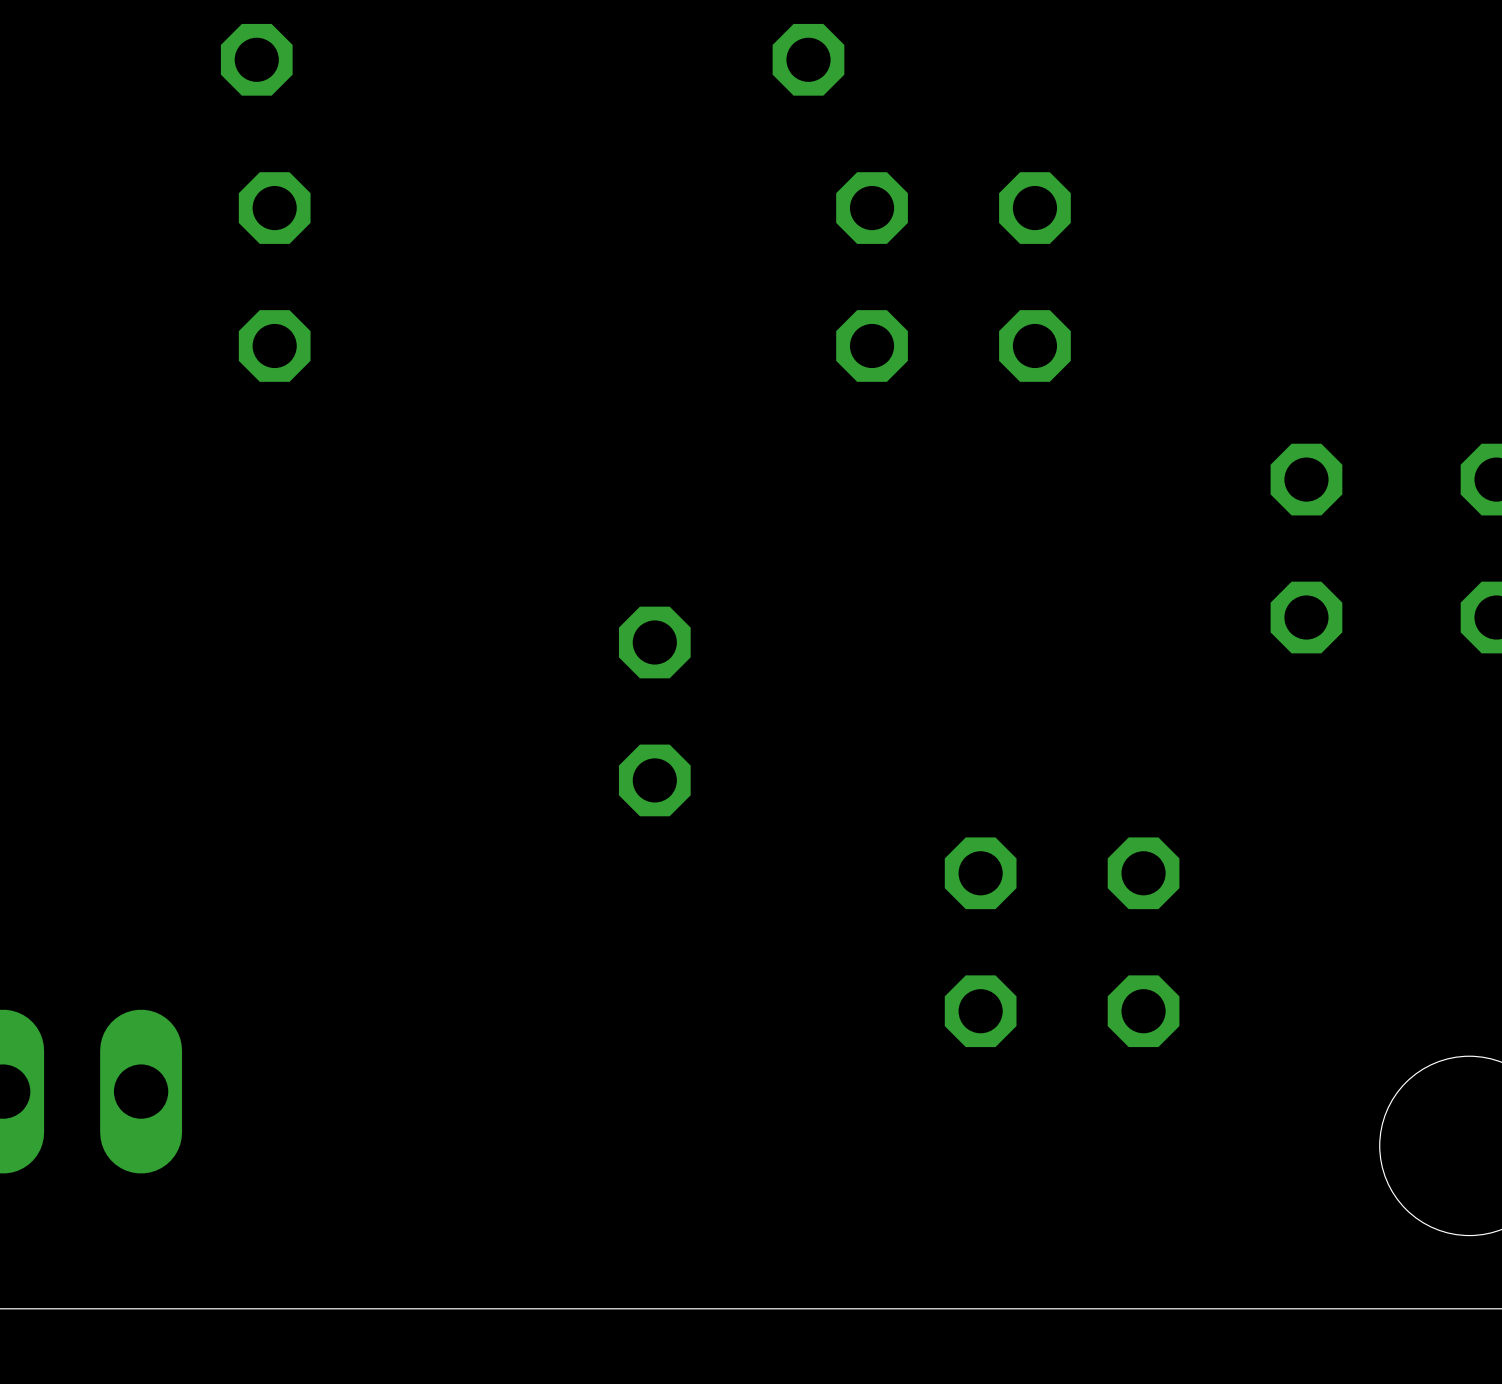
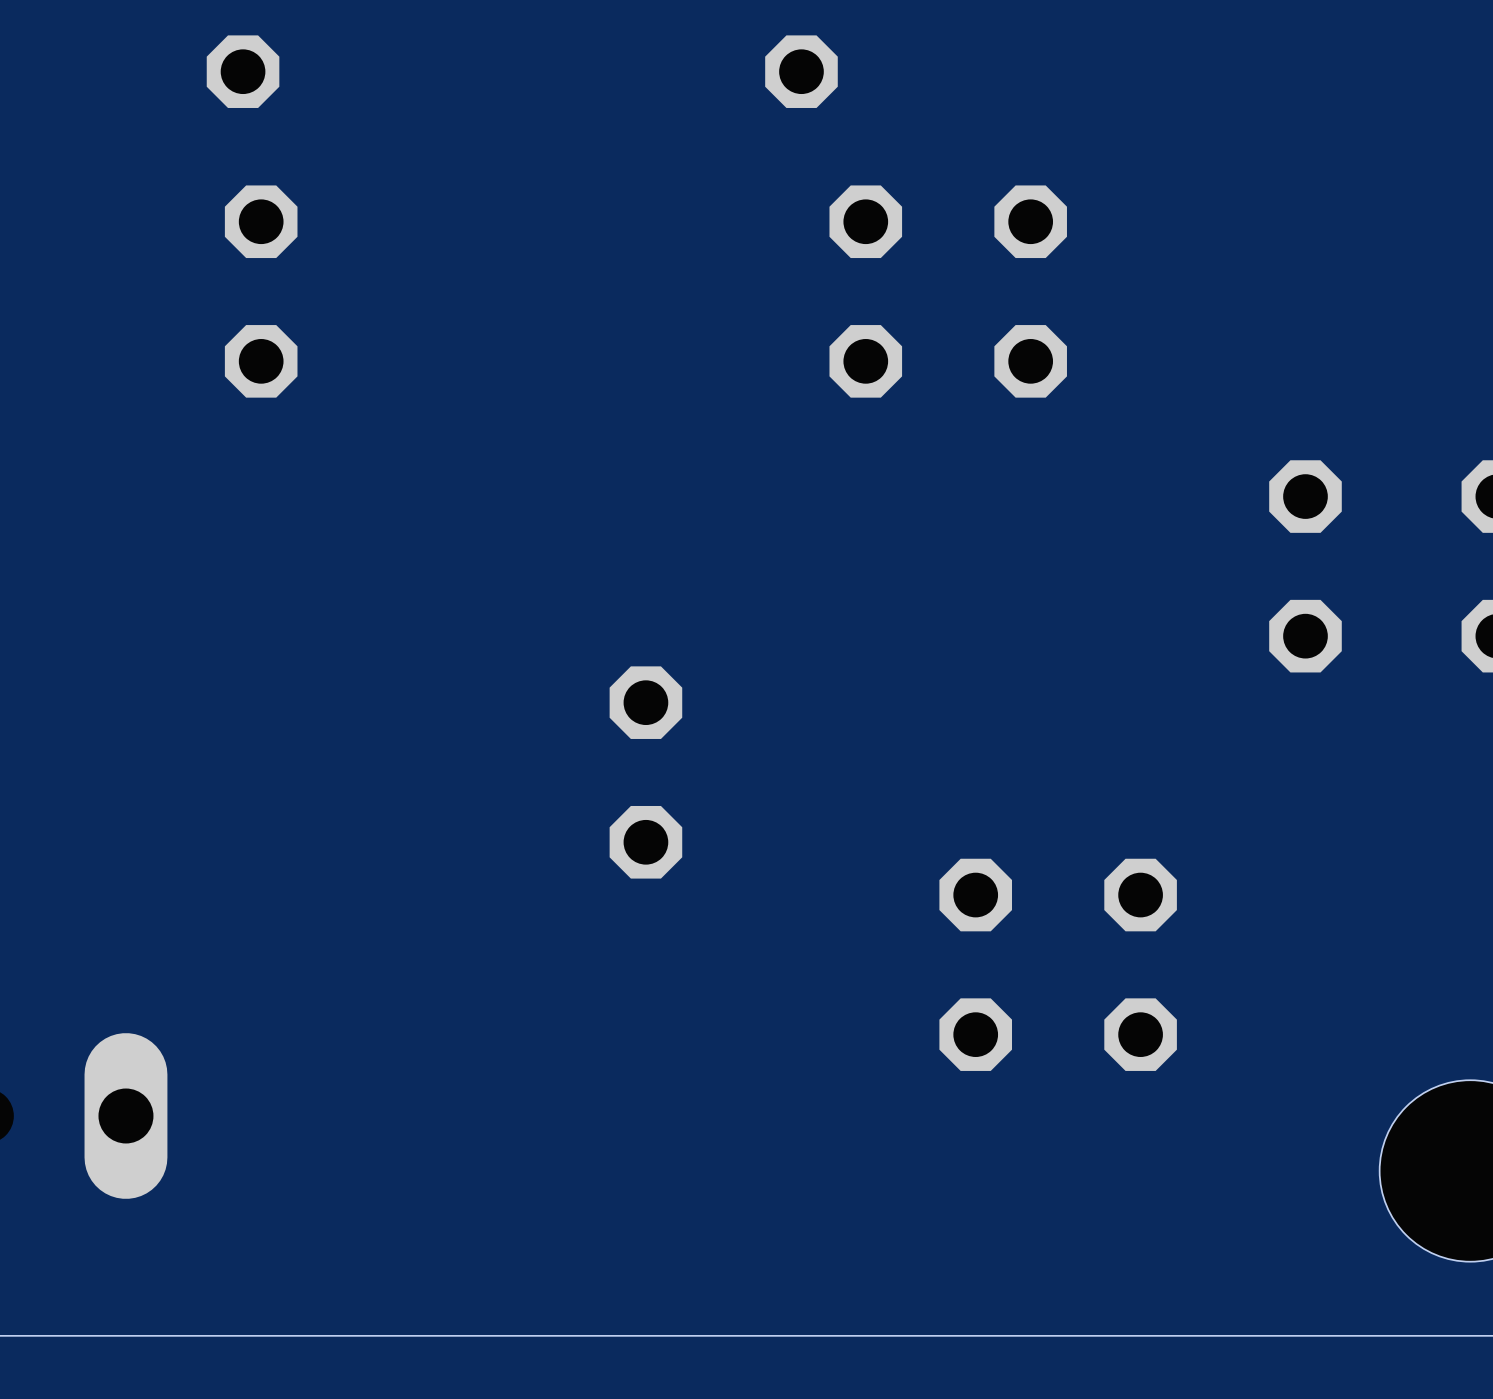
part position: (654, 711) -> (645, 772)

